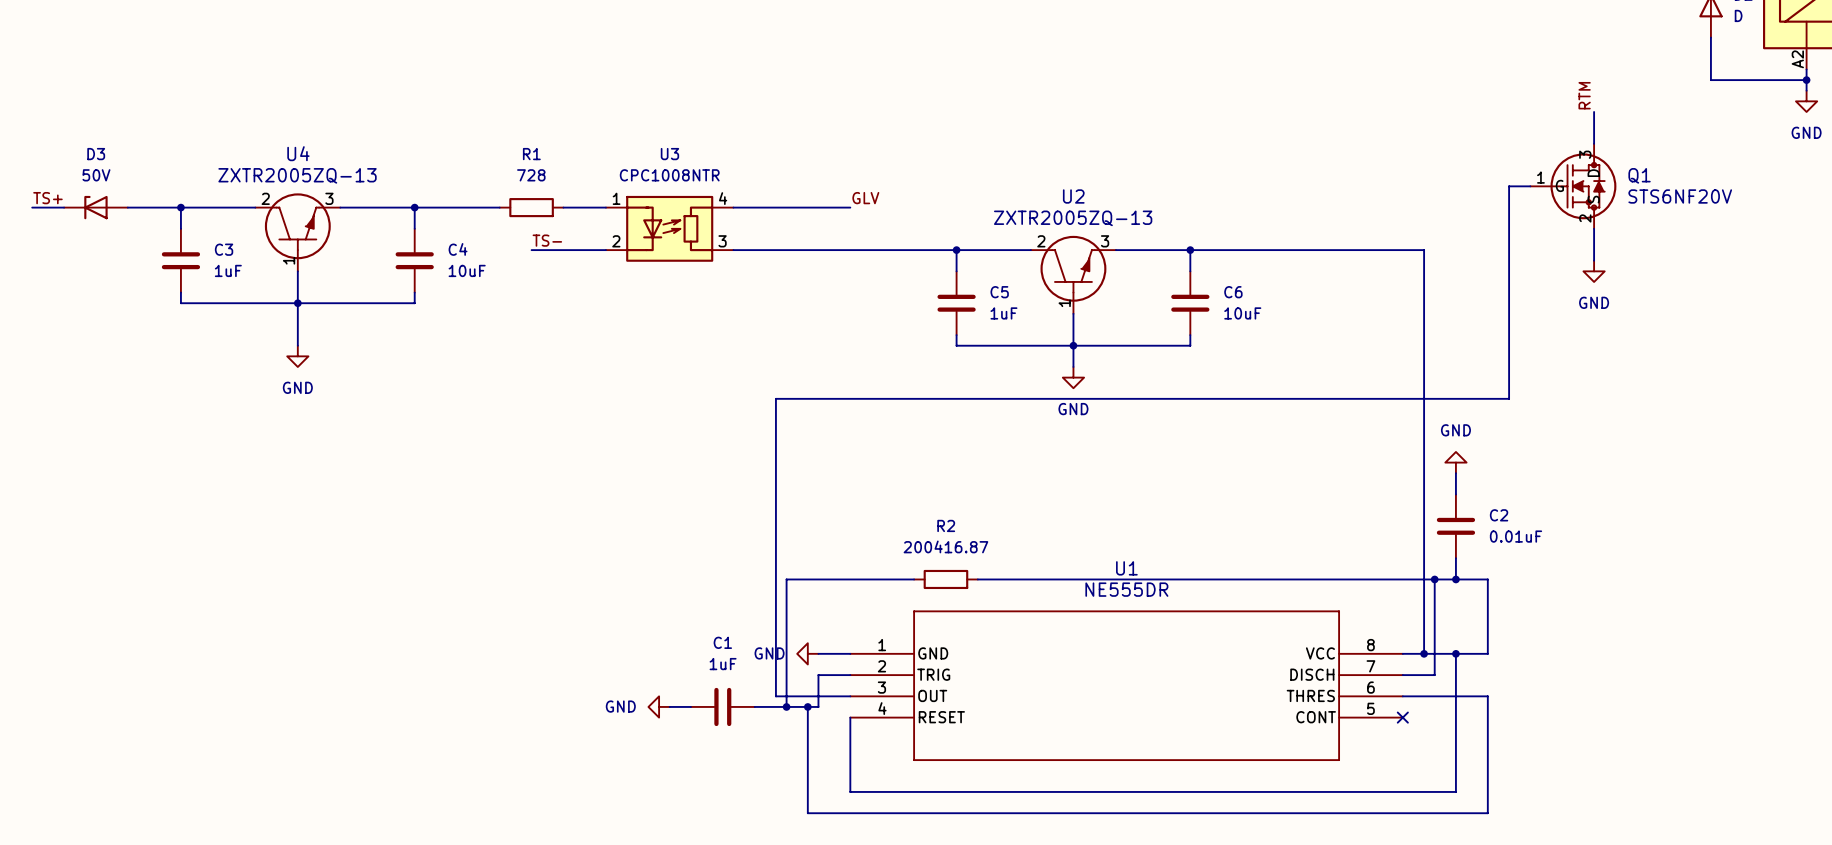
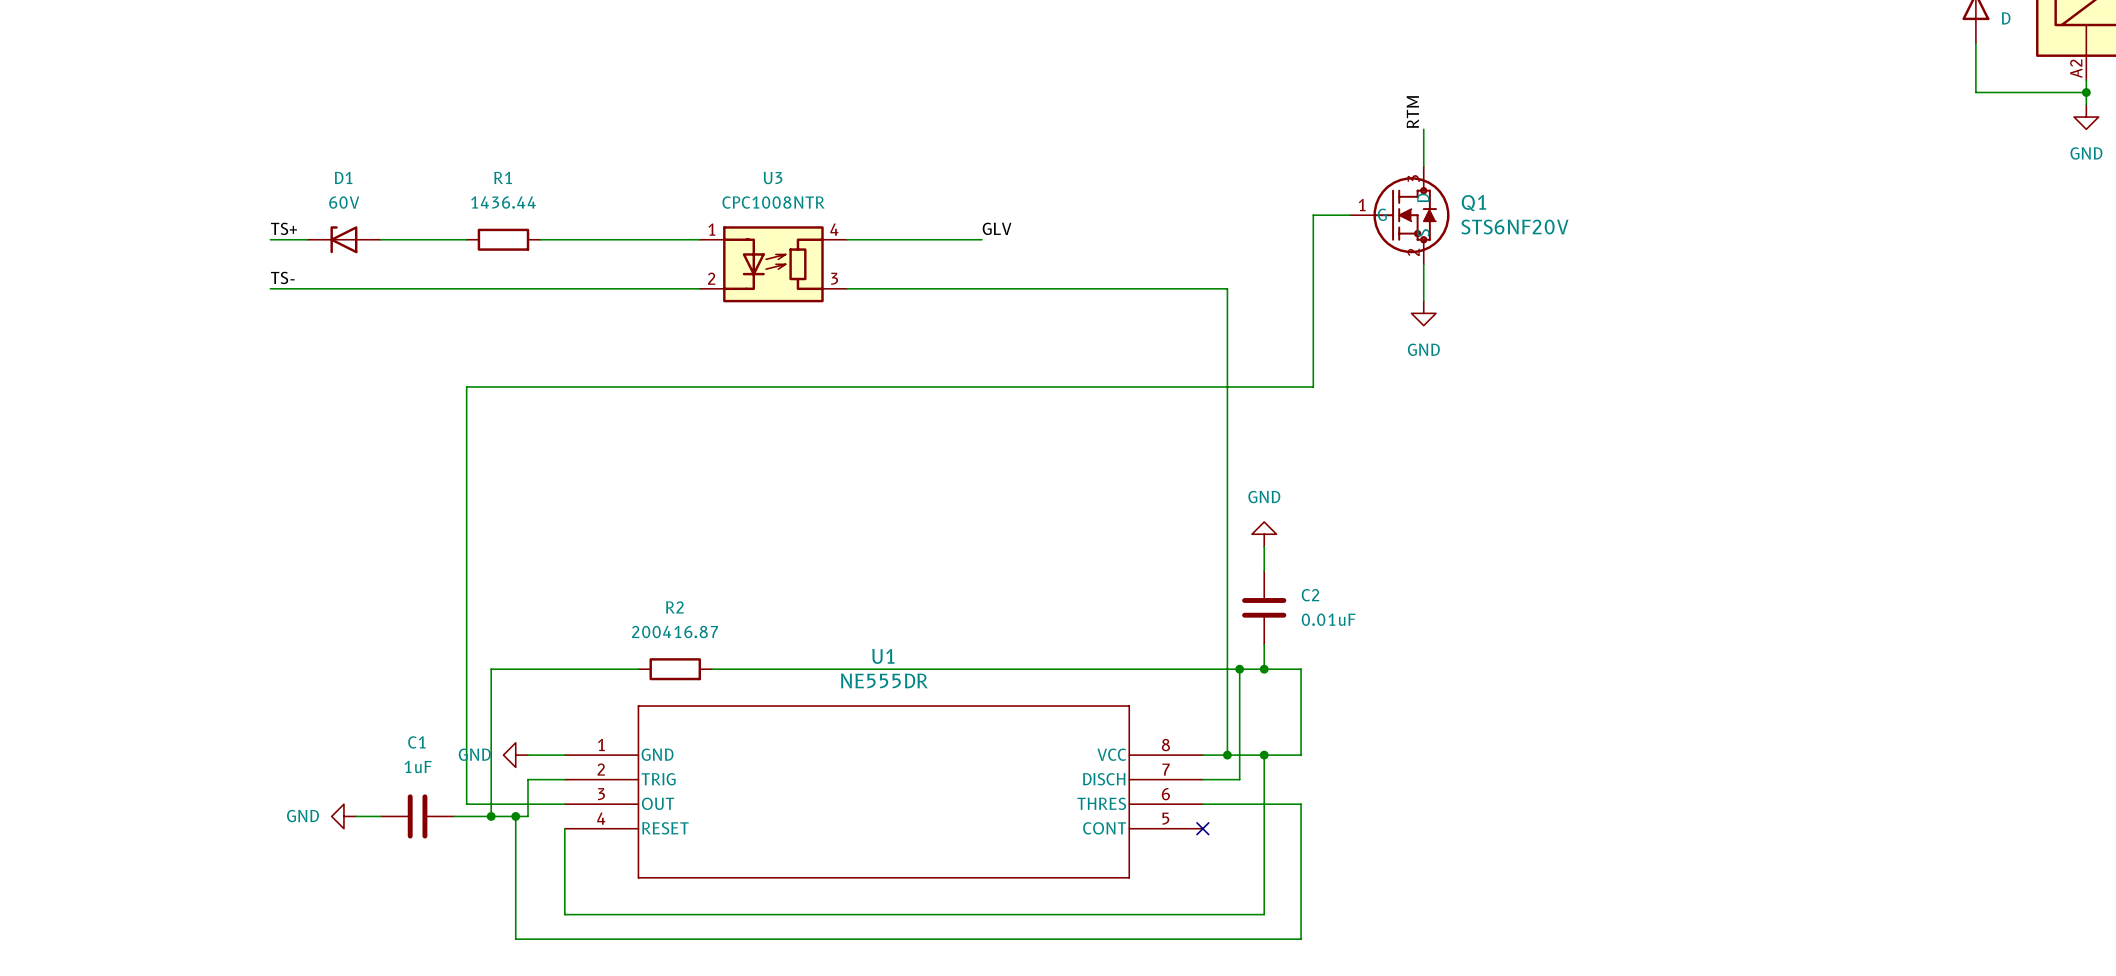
label: none -> RTM (1412, 112)
label: RTM (1584, 95) -> none
wire: none -> (1423, 129) (1423, 166)
wire: (1594, 111) (1594, 143) -> none
R1 value: 728 (531, 175) -> 1436.44 (503, 202)
wire: none -> (1350, 215) (1313, 215) (1313, 386) (466, 386) (466, 804) (564, 804)
wire: (1530, 186) (1509, 186) (1509, 398) (775, 398) (775, 696) (850, 696) -> none
Q1 position: (1573, 186) -> (1399, 215)
label position: TS+ (47, 198) -> TS+ (283, 228)
wire: (32, 207) (64, 207) -> none
D3: 50V (95, 207) -> none
wire: (127, 207) (234, 207) -> none
wire: (180, 207) (180, 228) -> none
junction: (180, 207) -> none
D1: none -> 60V (343, 239)
wire: (404, 207) (467, 207) -> (577, 239) (650, 239)
wire: (414, 207) (414, 228) -> none
junction: (414, 207) -> none
R1 position: (531, 207) -> (503, 239)
wire: none -> (1423, 264) (1423, 301)
wire: (1594, 228) (1594, 260) -> none
U4: ZXTR2005ZQ-13 (297, 232) -> none
label: none -> TS- (282, 277)
label: TS- (547, 240) -> none
wire: none -> (270, 288) (613, 288)
wire: (956, 250) (956, 271) -> none
junction: (956, 250) -> none
wire: none -> (1190, 288) (1227, 288) (1227, 755)
wire: (1115, 250) (1424, 250) (1424, 653) -> none
wire: (1190, 250) (1190, 271) -> none
junction: (1190, 250) -> none
C3: 1uF (180, 260) -> none
C4: 10uF (414, 260) -> none
wire: (297, 271) (297, 345) -> none
power symbol: none -> GND (1423, 313)
power symbol: GND (1594, 271) -> none
U2: ZXTR2005ZQ-13 (1073, 274) -> none
wire: (180, 292) (180, 303) (414, 303) (414, 292) -> none
junction: (297, 303) -> none
C5: 1uF (956, 303) -> none
C6: 10uF (1190, 303) -> none
wire: (1073, 313) (1073, 366) -> none
wire: (956, 335) (956, 345) (1190, 345) (1190, 335) -> none
junction: (1073, 345) -> none
power symbol: GND (297, 356) -> none
power symbol rotation: 0° (1073, 377) -> 180° (1264, 534)
power symbol position: GND (1073, 377) -> GND (1264, 534)
power symbol: GND (1455, 462) -> none
wire: none -> (1264, 546) (1264, 571)
wire: (1455, 473) (1455, 494) -> none
C2 position: (1455, 526) -> (1264, 607)
wire: none -> (1264, 644) (1264, 669)
wire: (1455, 558) (1455, 579) -> none
wire: none -> (638, 669) (491, 669) (491, 816)
wire: (786, 579) (786, 706) -> (908, 669) (712, 669)
wire: none -> (1055, 669) (1129, 669)
R2 position: (945, 579) -> (675, 669)
wire: none -> (1239, 669) (1239, 779) (1202, 779)
junction: none -> (1239, 669)
junction: none -> (1264, 669)
wire: (1126, 579) (1487, 579) (1487, 653) (1402, 653) -> (1301, 669) (1301, 755) (1202, 755)
wire: (1434, 579) (1434, 675) (1402, 675) -> none
junction: (1434, 579) -> none
junction: (1455, 579) -> none
power symbol: none -> GND (515, 755)
wire: none -> (528, 755) (564, 755)
power symbol: GND (807, 653) -> none
wire: (818, 653) (850, 653) -> none
junction: none -> (1227, 755)
junction: none -> (1264, 755)
junction: (1424, 653) -> none
wire: (1455, 653) (1455, 791) (1094, 791) -> (1264, 755) (1264, 914)
junction: (1455, 653) -> none
wire: none -> (564, 779) (528, 779) (528, 816) (454, 816)
wire: (850, 675) (818, 675) (818, 706) (754, 706) -> none
U1 position: (1126, 685) -> (883, 791)
wire: (1402, 696) (1487, 696) (1487, 813) (1126, 813) -> (1202, 804) (1301, 804) (1301, 939)
power symbol: none -> GND (343, 816)
wire: none -> (356, 816) (380, 816)
junction: none -> (491, 816)
junction: none -> (515, 816)
power symbol: GND (659, 706) -> none
wire: (669, 706) (690, 706) -> none
C1 position: (722, 706) -> (417, 816)
junction: (786, 706) -> none
wire: (807, 706) (807, 813) -> (515, 816) (515, 939) (932, 939)
junction: (807, 706) -> none
wire: (850, 717) (850, 791) -> (564, 828) (564, 914) (982, 914)
no-connect mark: none -> (1202, 828)
no-connect mark: (1402, 717) -> none

